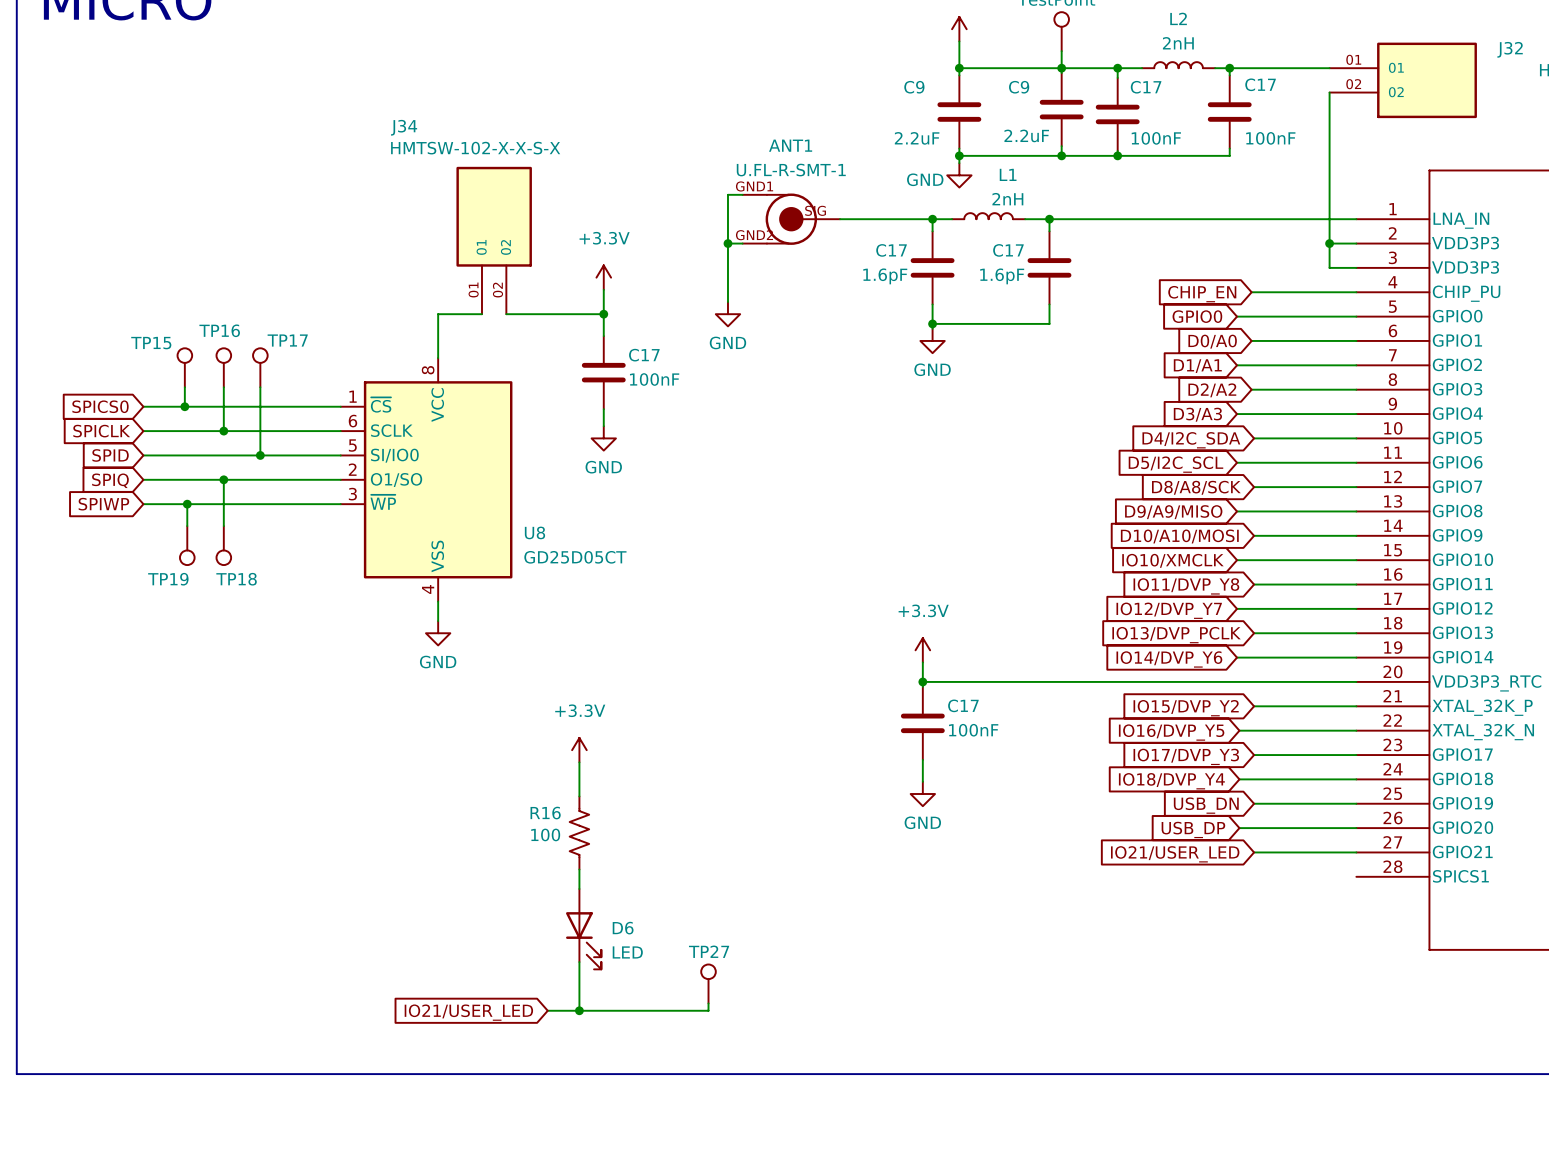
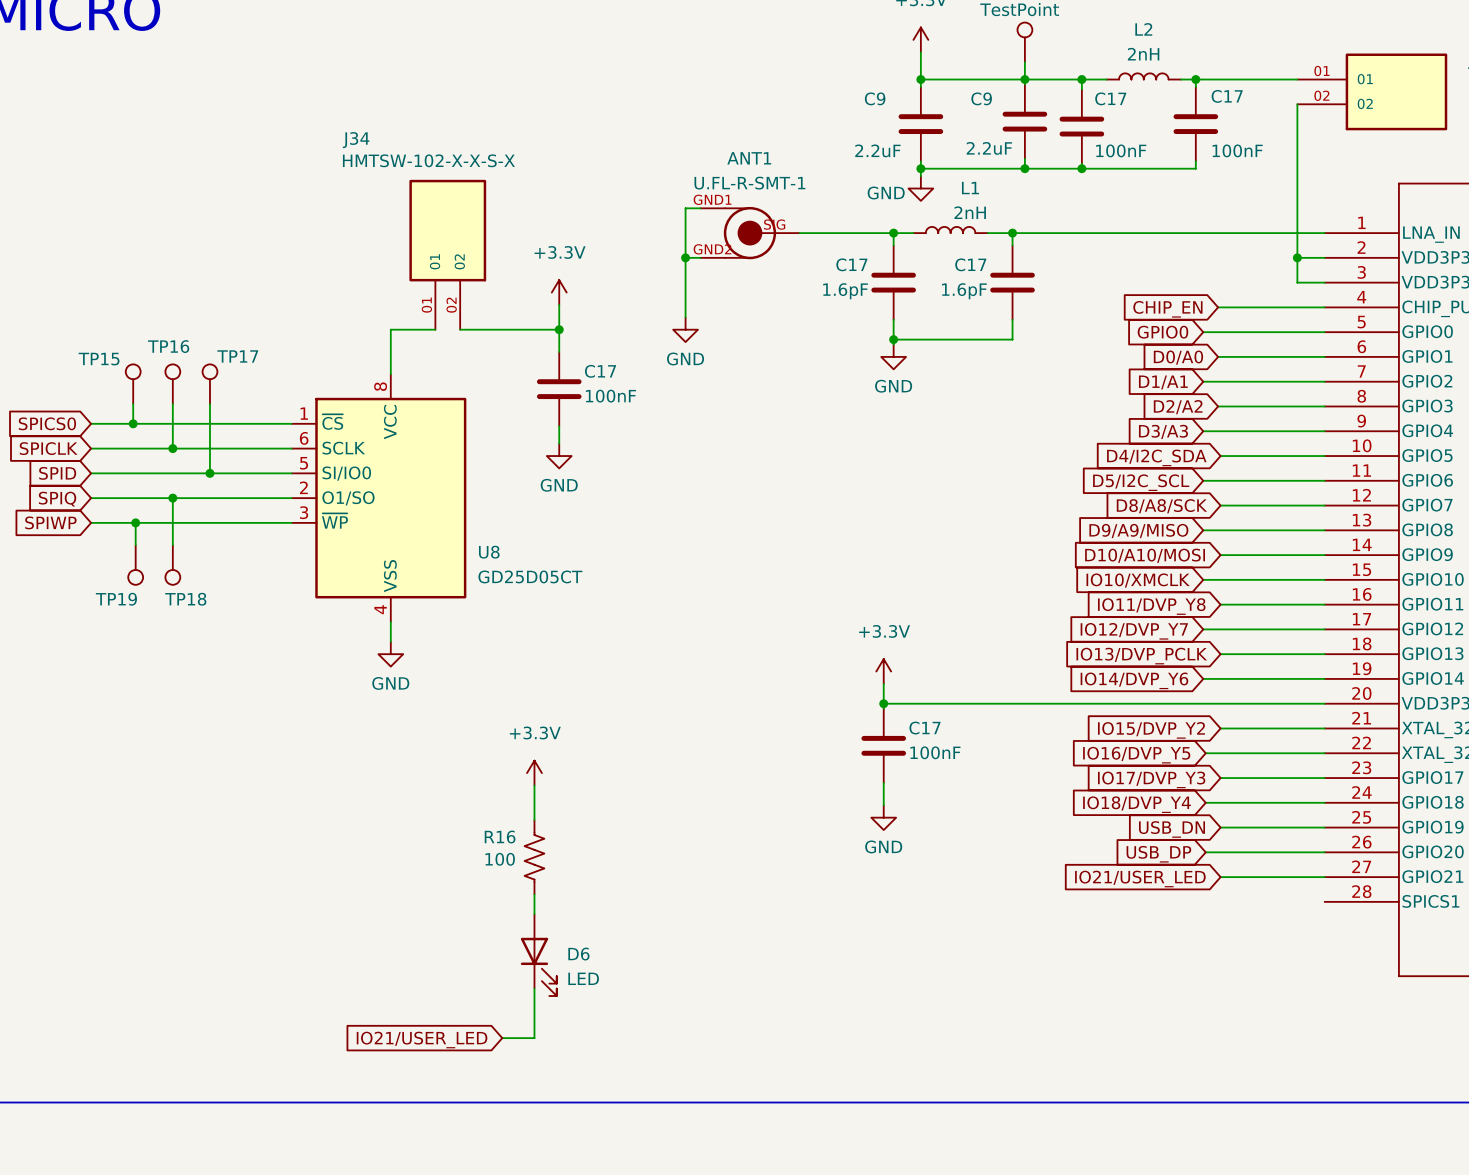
TP27: (708, 983) -> none
wire: (708, 1003) (708, 1010) (579, 1010) -> none
junction: (579, 1010) -> none

